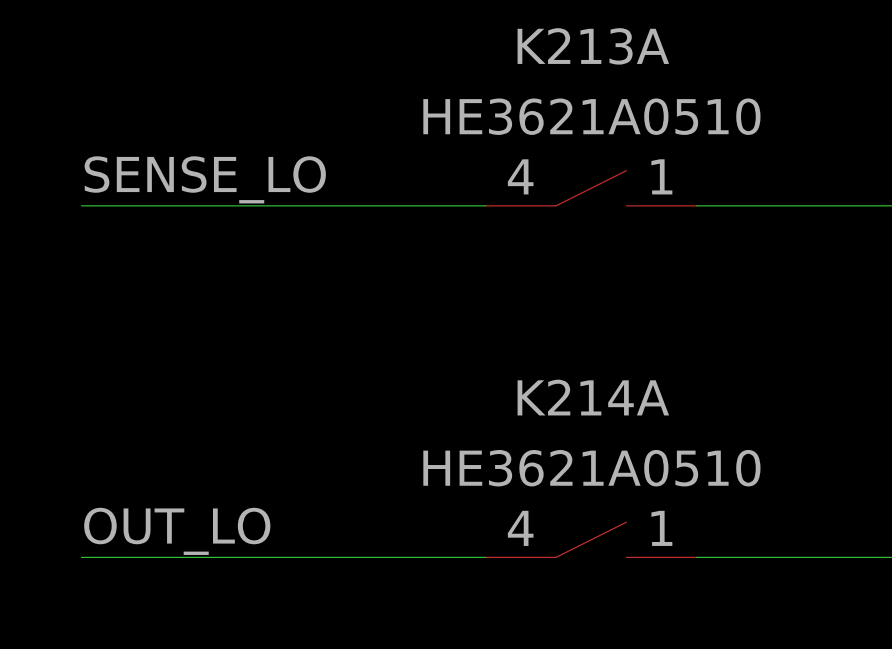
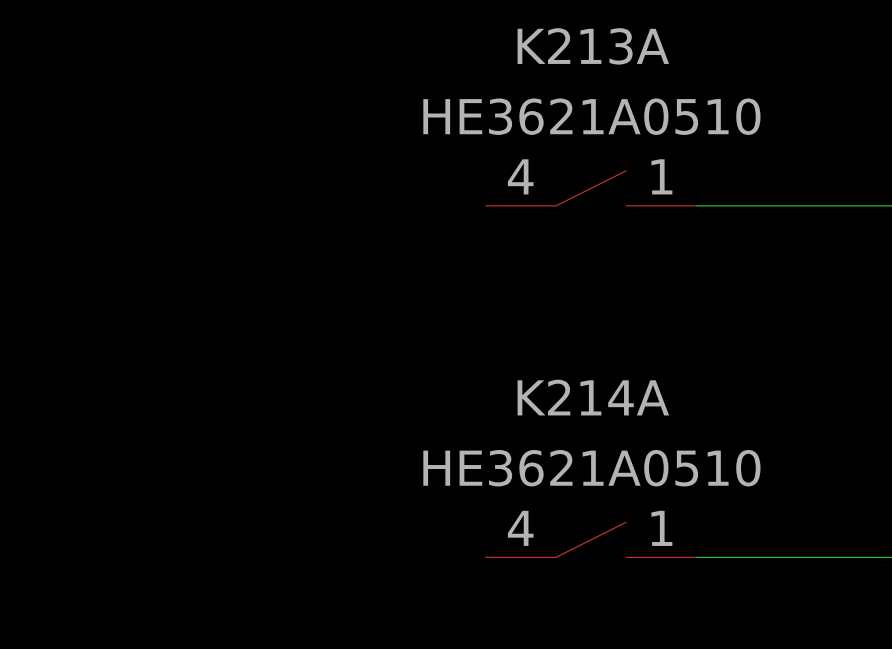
label: SENSE_LO (205, 179) -> none
wire: (81, 205) (485, 205) -> none
label: OUT_LO (177, 531) -> none
wire: (81, 557) (485, 557) -> none

